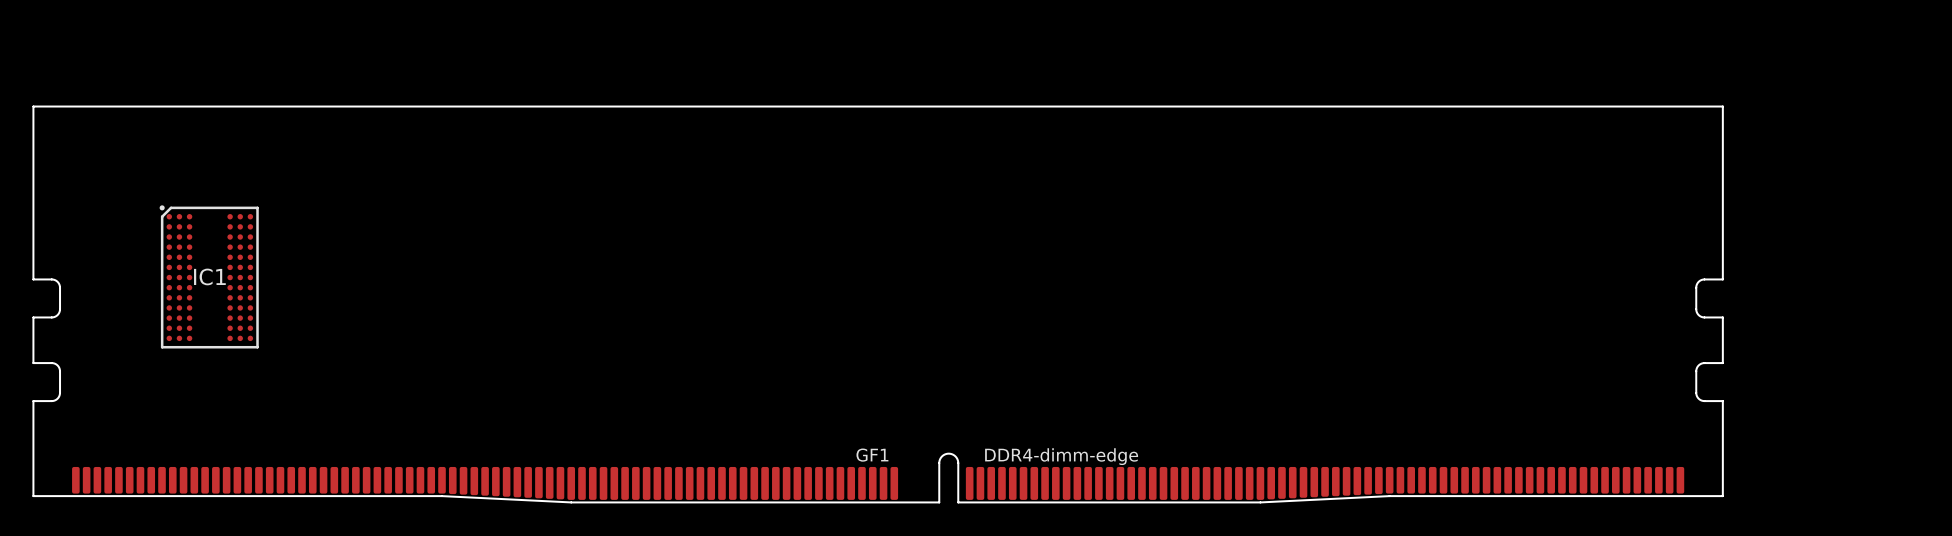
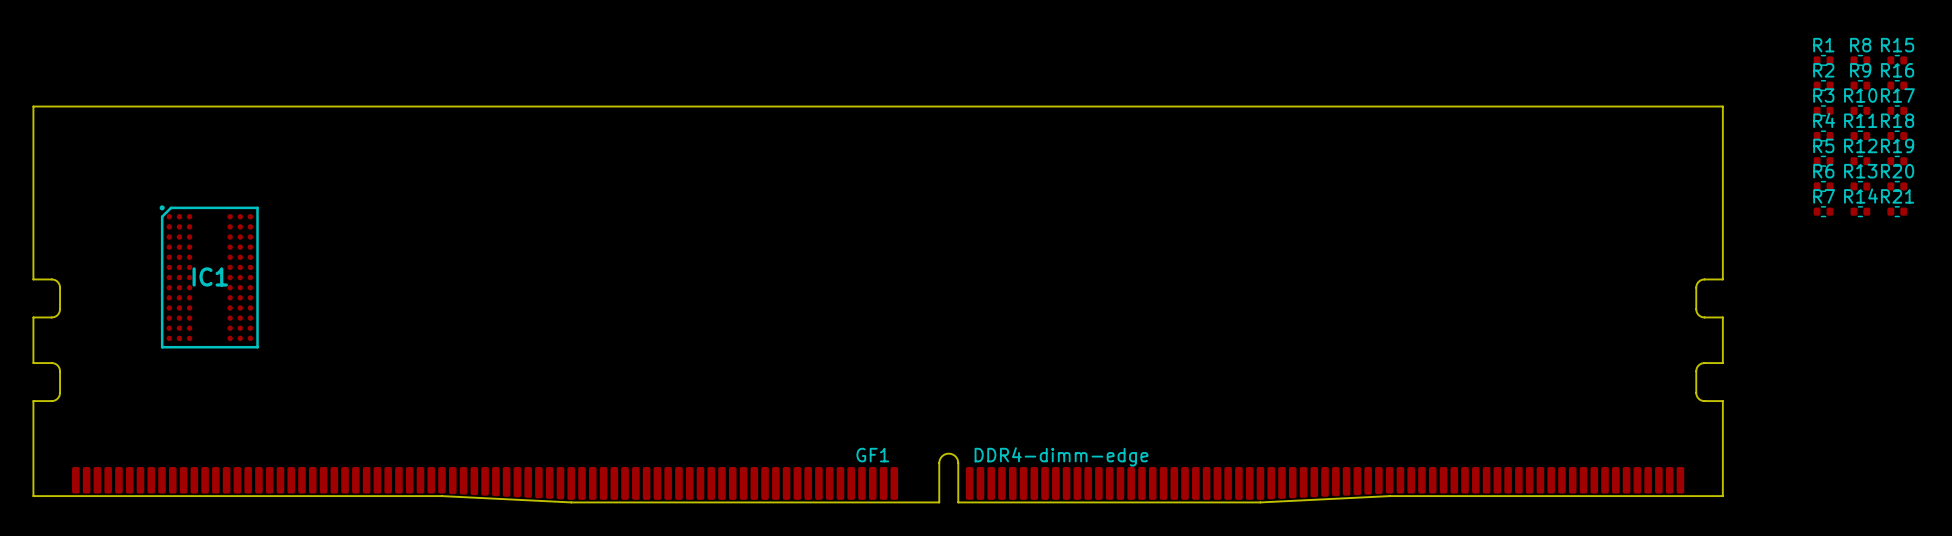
R1: none -> (1823, 60)
R8: none -> (1860, 60)
R15: none -> (1897, 60)
R2: none -> (1823, 85)
R9: none -> (1860, 85)
R16: none -> (1897, 85)
R3: none -> (1823, 110)
R10: none -> (1860, 110)
R17: none -> (1897, 110)
R4: none -> (1823, 136)
R11: none -> (1860, 136)
R18: none -> (1897, 136)
R5: none -> (1823, 161)
R12: none -> (1860, 161)
R19: none -> (1897, 161)
R6: none -> (1823, 186)
R13: none -> (1860, 186)
R20: none -> (1897, 186)
R7: none -> (1823, 211)
R14: none -> (1860, 211)
R21: none -> (1897, 211)

